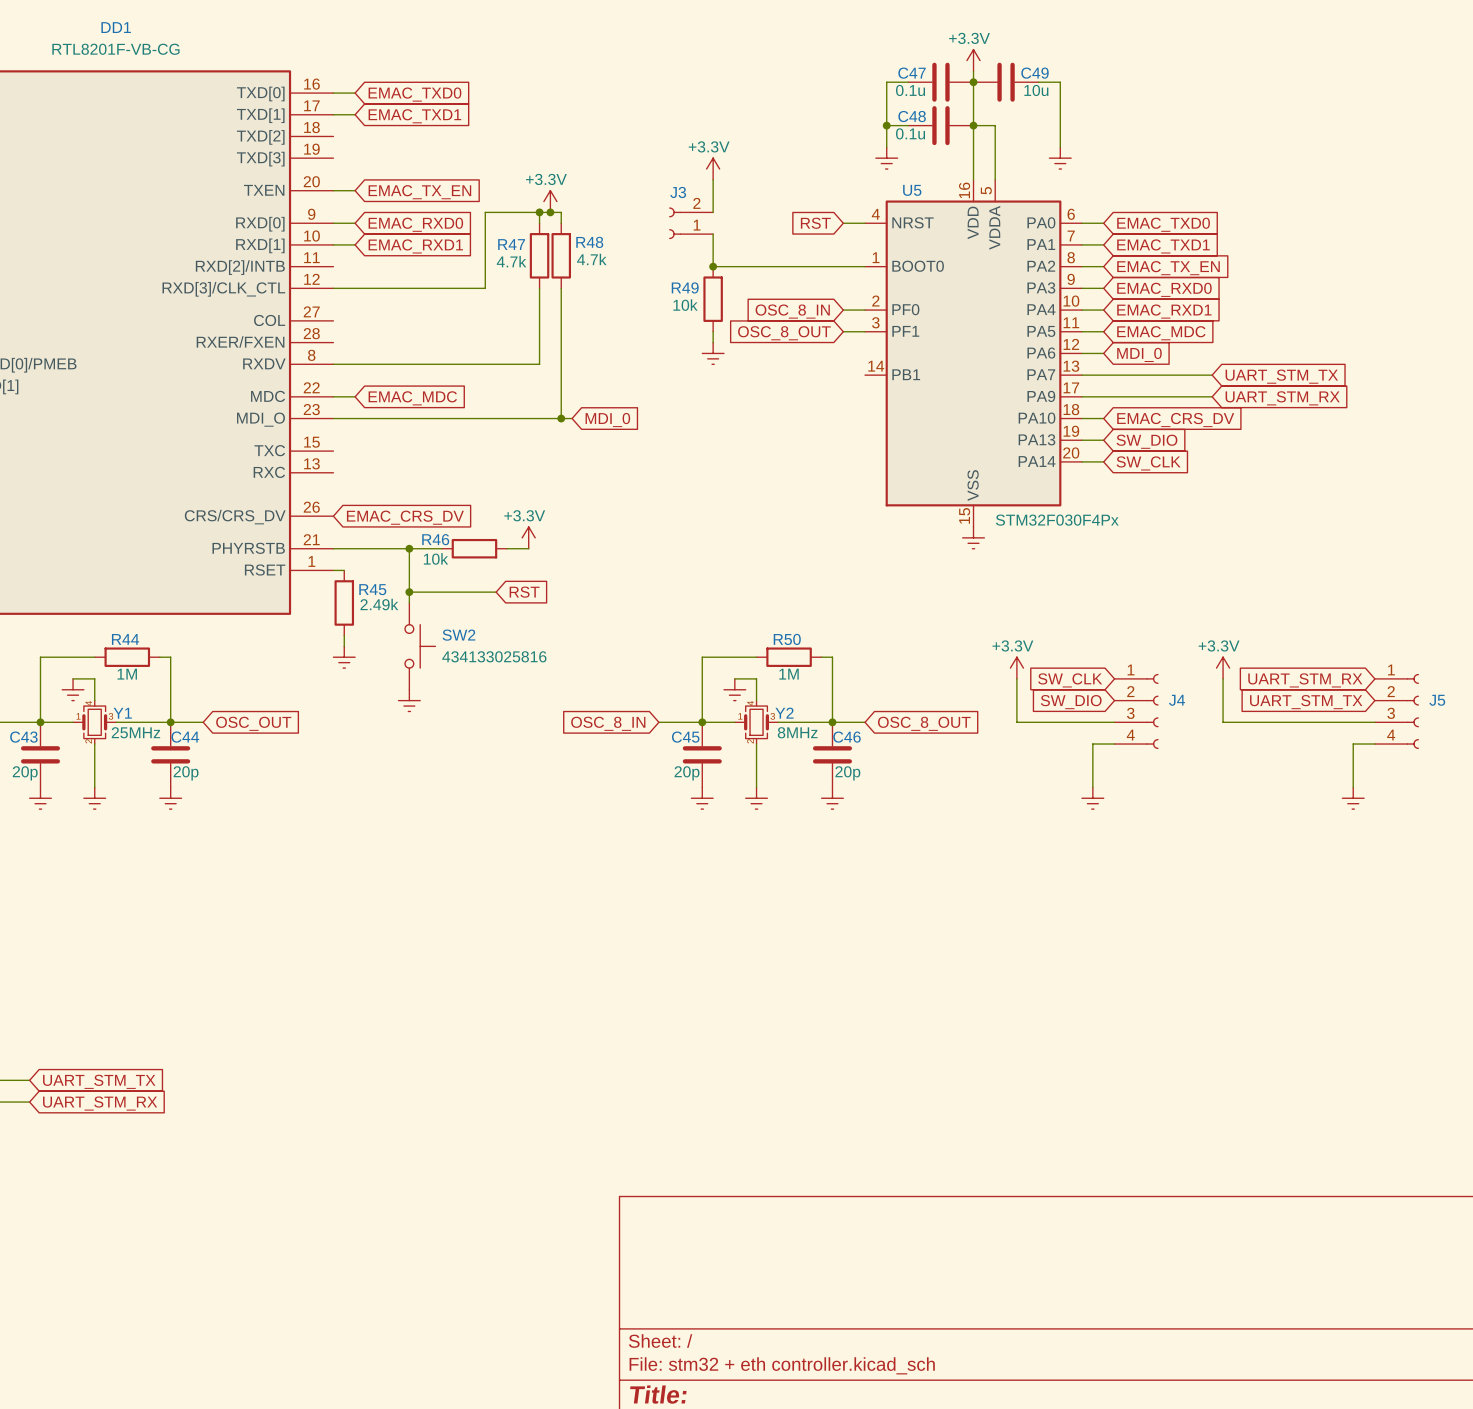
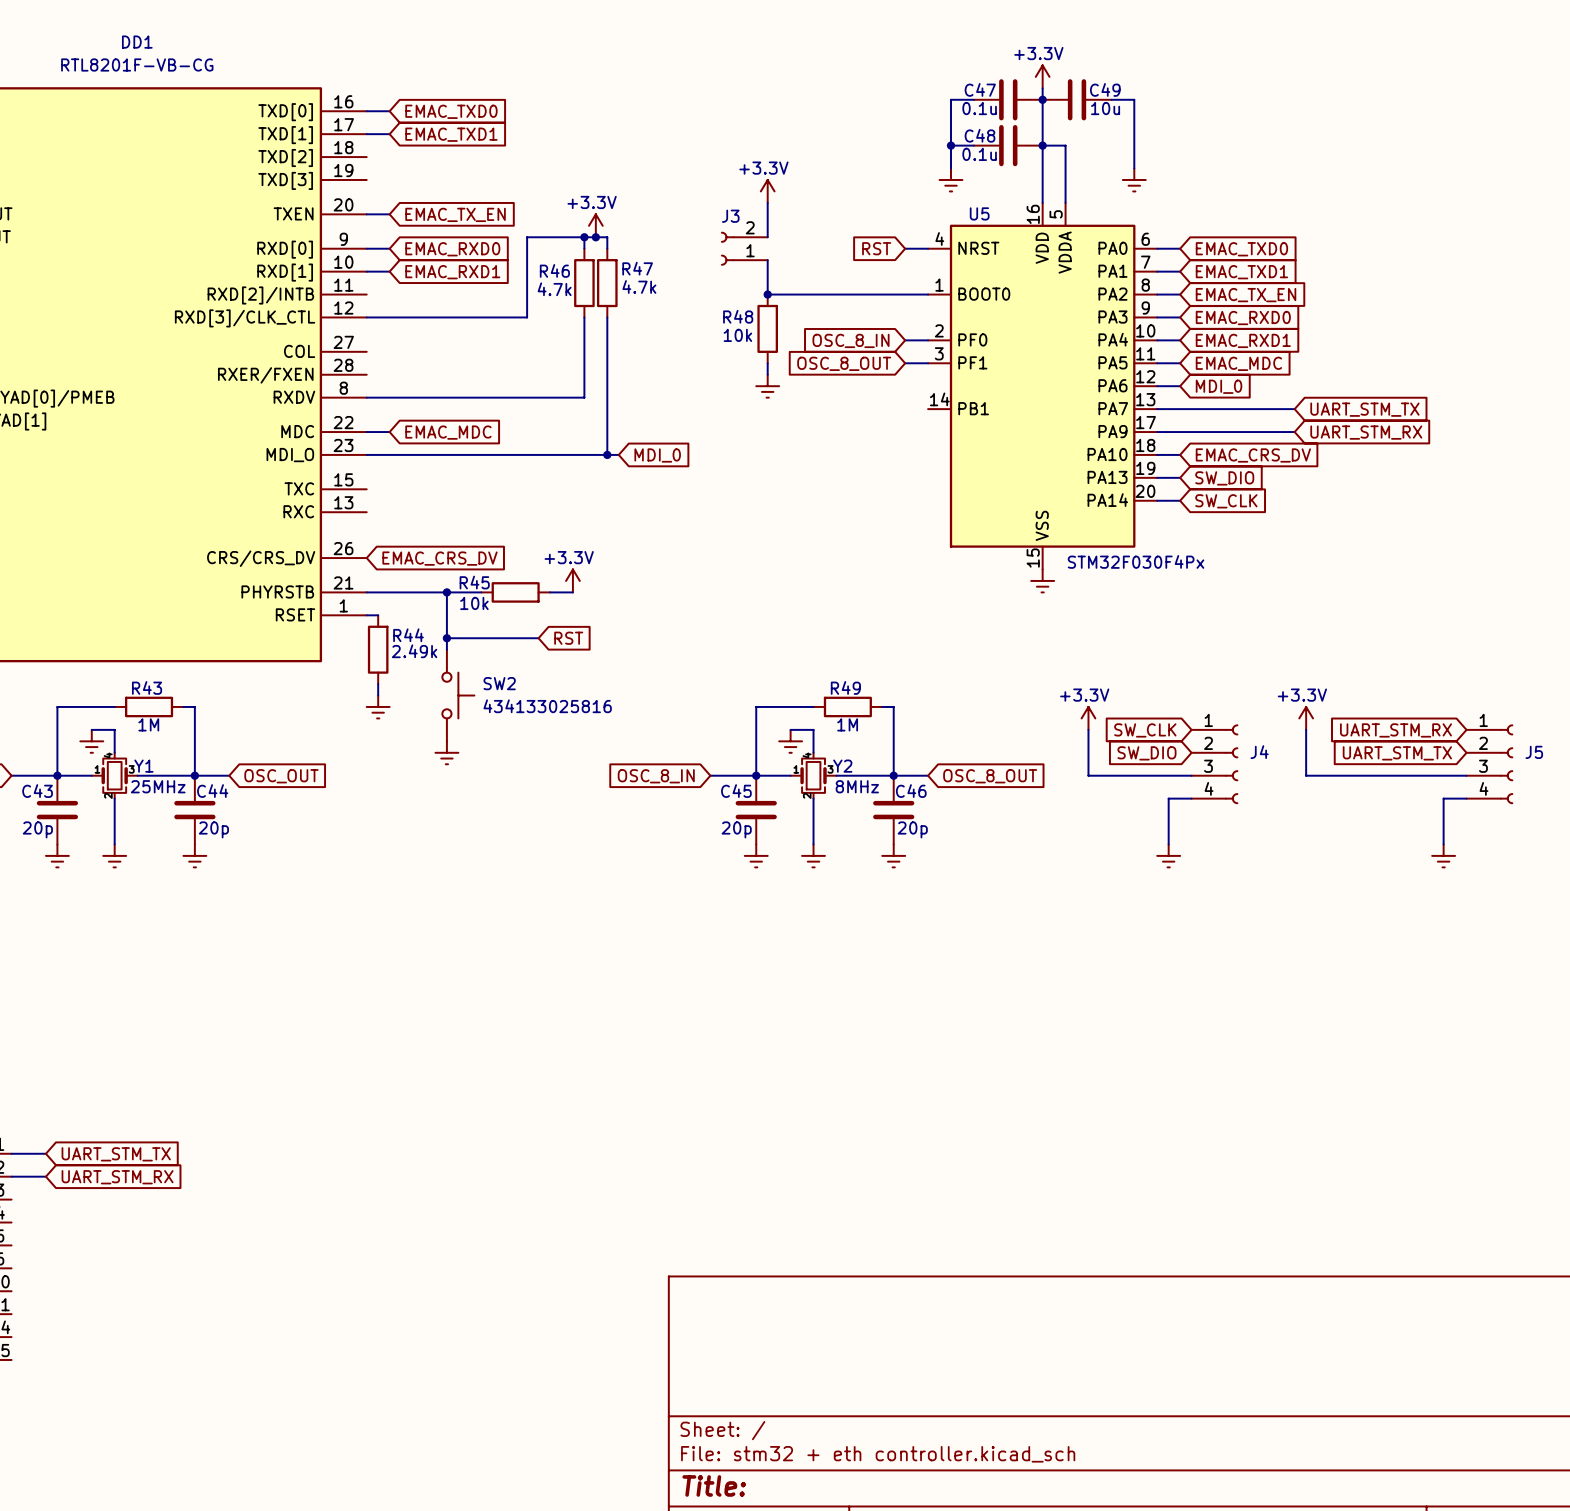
R48 name: R48 (589, 242) -> R47 (637, 268)
R47 name: R47 (511, 244) -> R46 (554, 270)
R49 name: R49 (685, 287) -> R48 (738, 316)
R46 name: R46 (435, 539) -> R45 (474, 582)
R45 name: R45 (372, 589) -> R44 (408, 635)
R44 name: R44 (125, 639) -> R43 (147, 687)
R50 name: R50 (787, 639) -> R49 (845, 687)

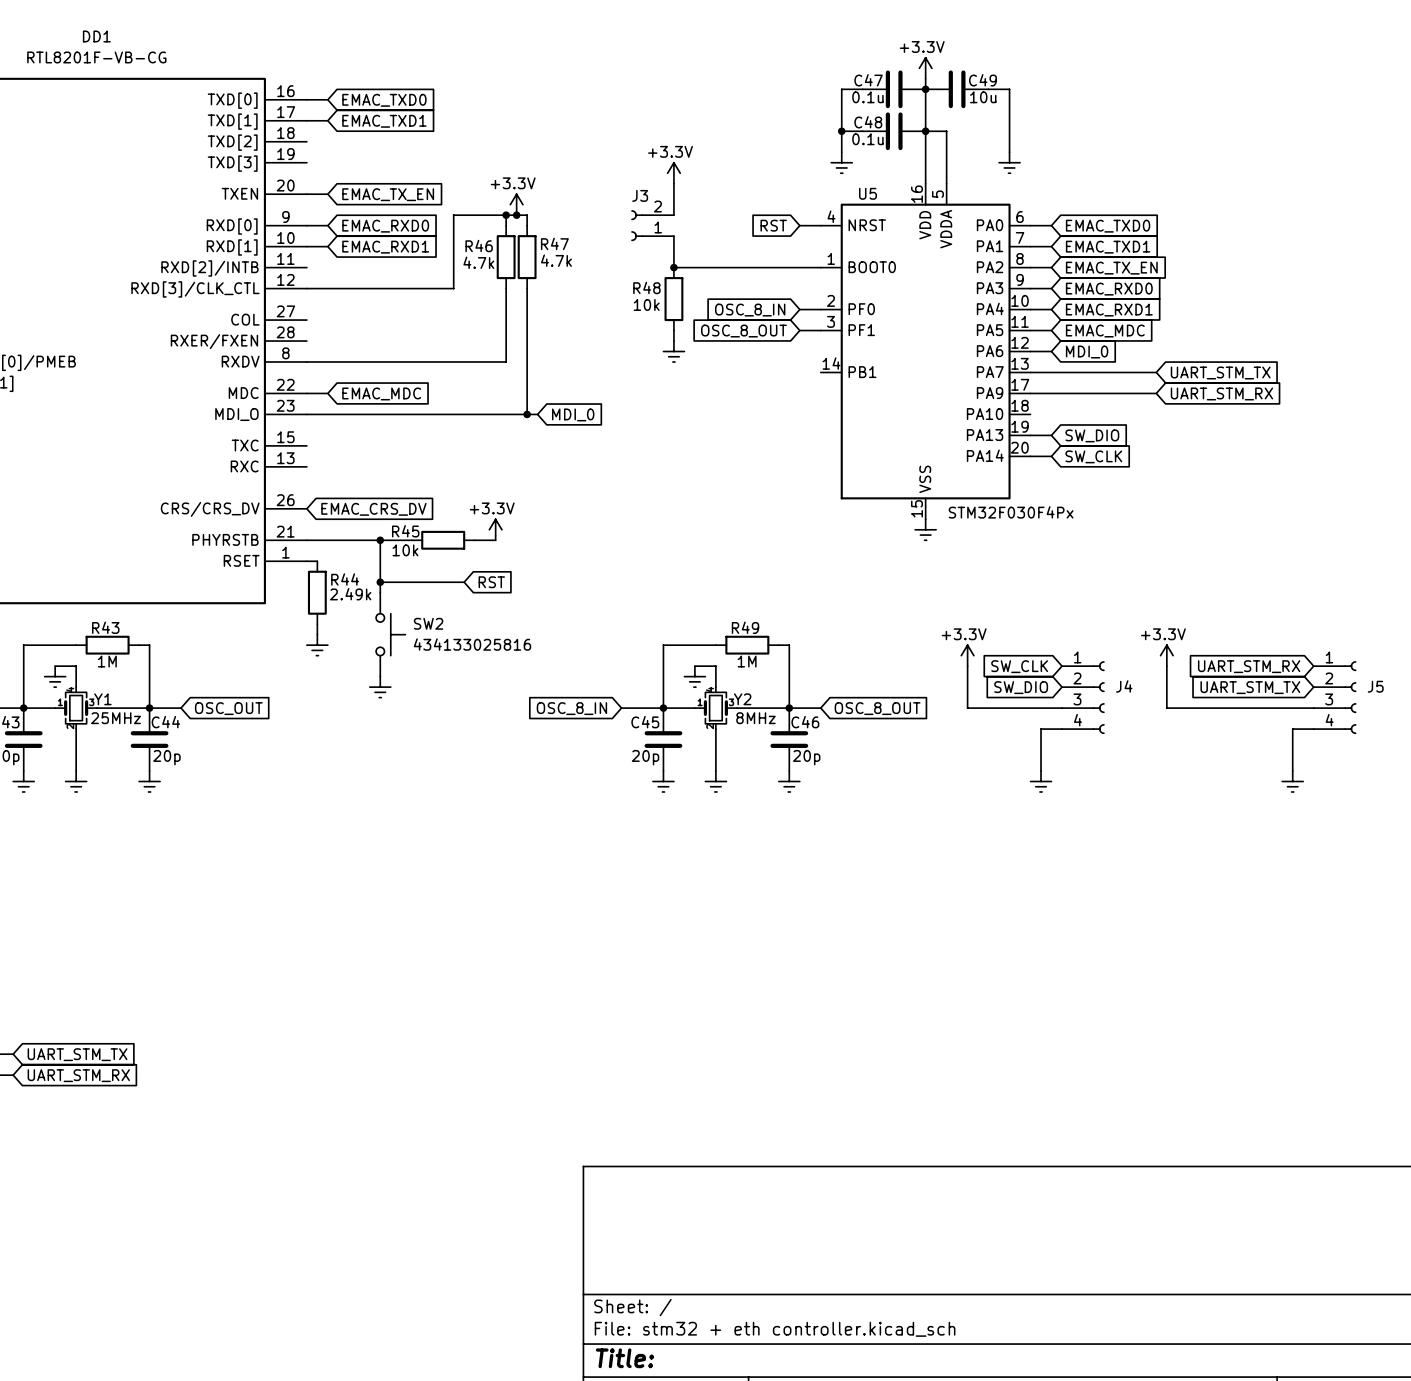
wire: (1157, 454) (1180, 454) -> none
global label: EMAC_CRS_DV (1253, 455) -> none

